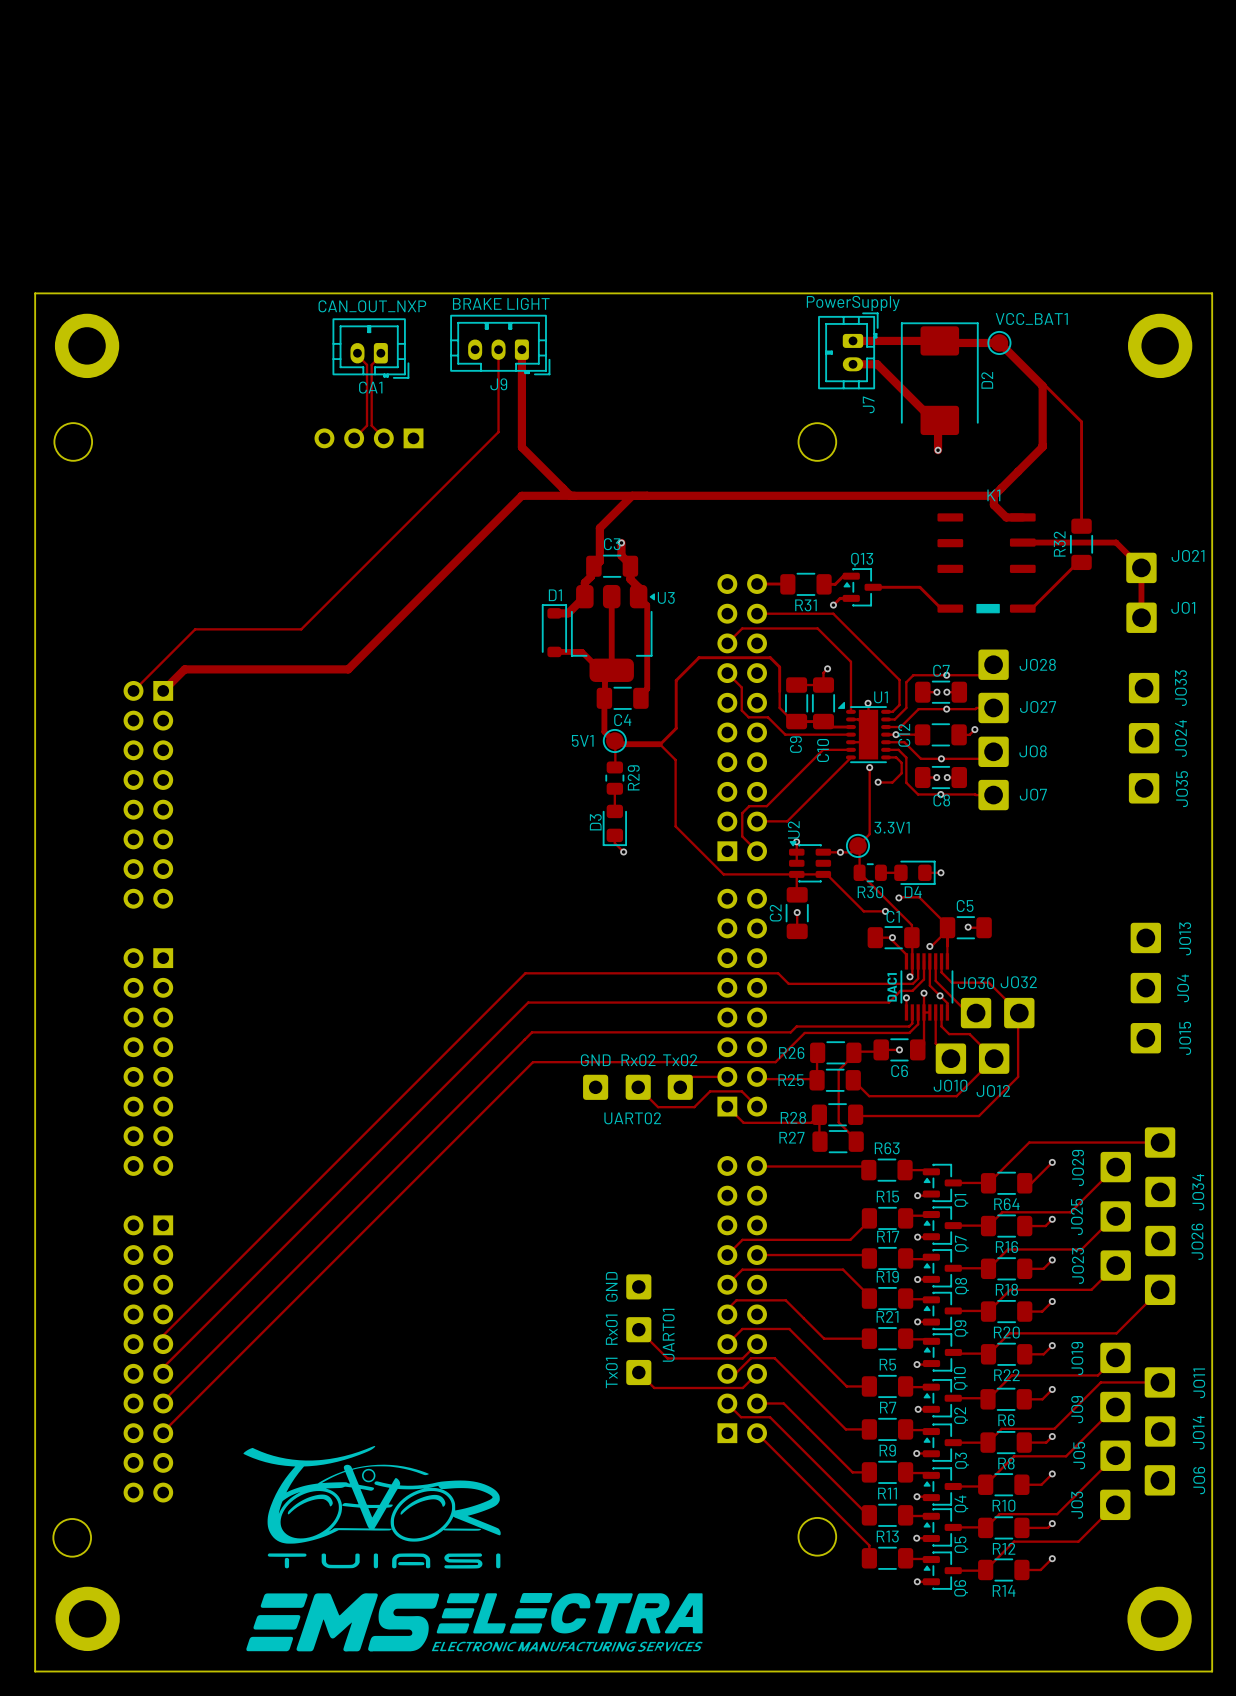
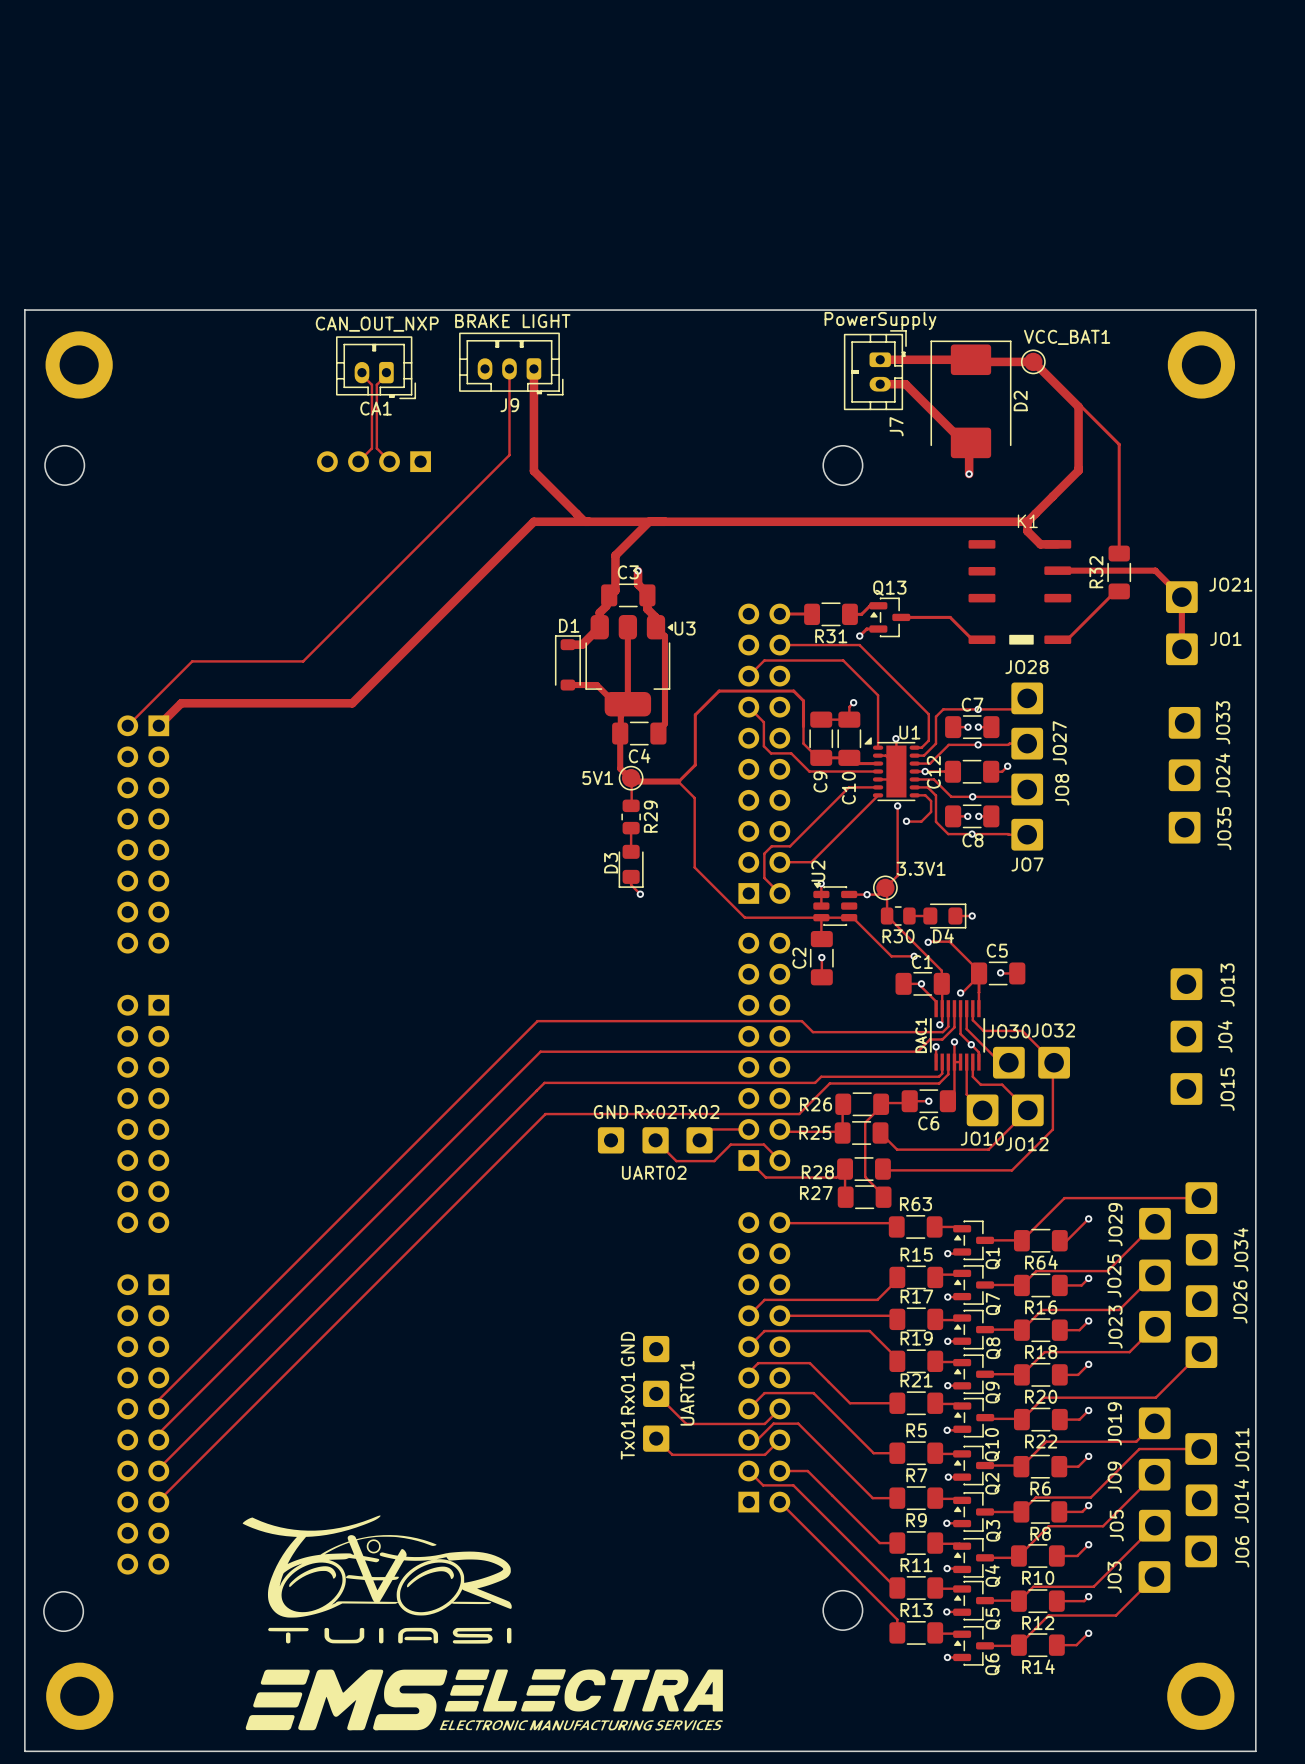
JO28 name position: JO28 (1037, 664) -> JO28 (1026, 667)
JO27 name rotation: 0° (1038, 706) -> 90° counterclockwise (1059, 743)
JO8 name rotation: 0° (1033, 751) -> 90° counterclockwise (1062, 789)
JO7 name position: JO7 (1033, 794) -> JO7 (1027, 864)

